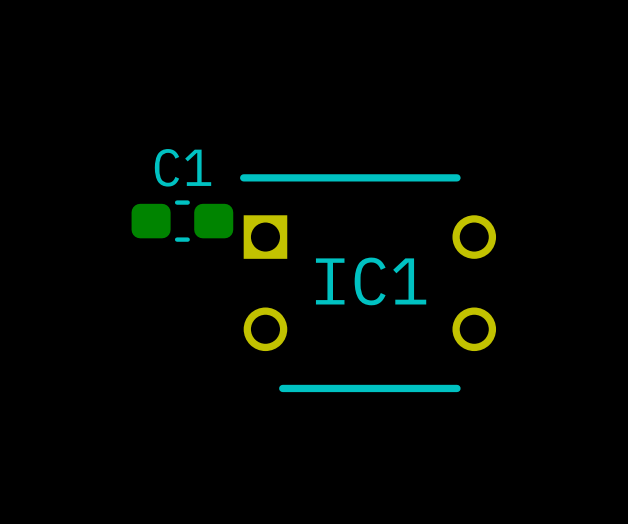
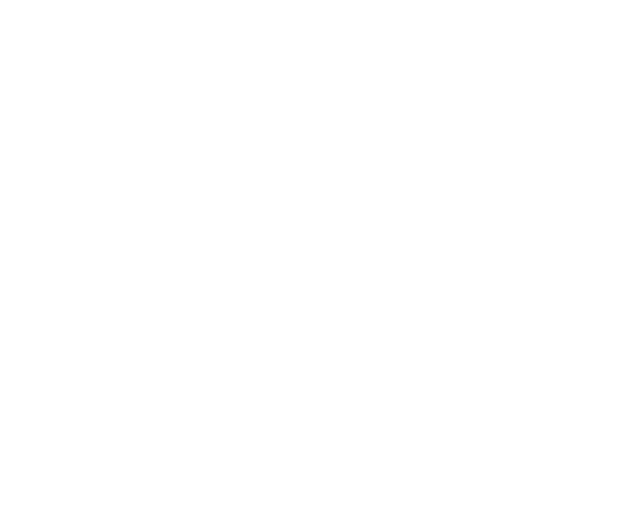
C1: (182, 221) -> none
IC1: (368, 283) -> none

